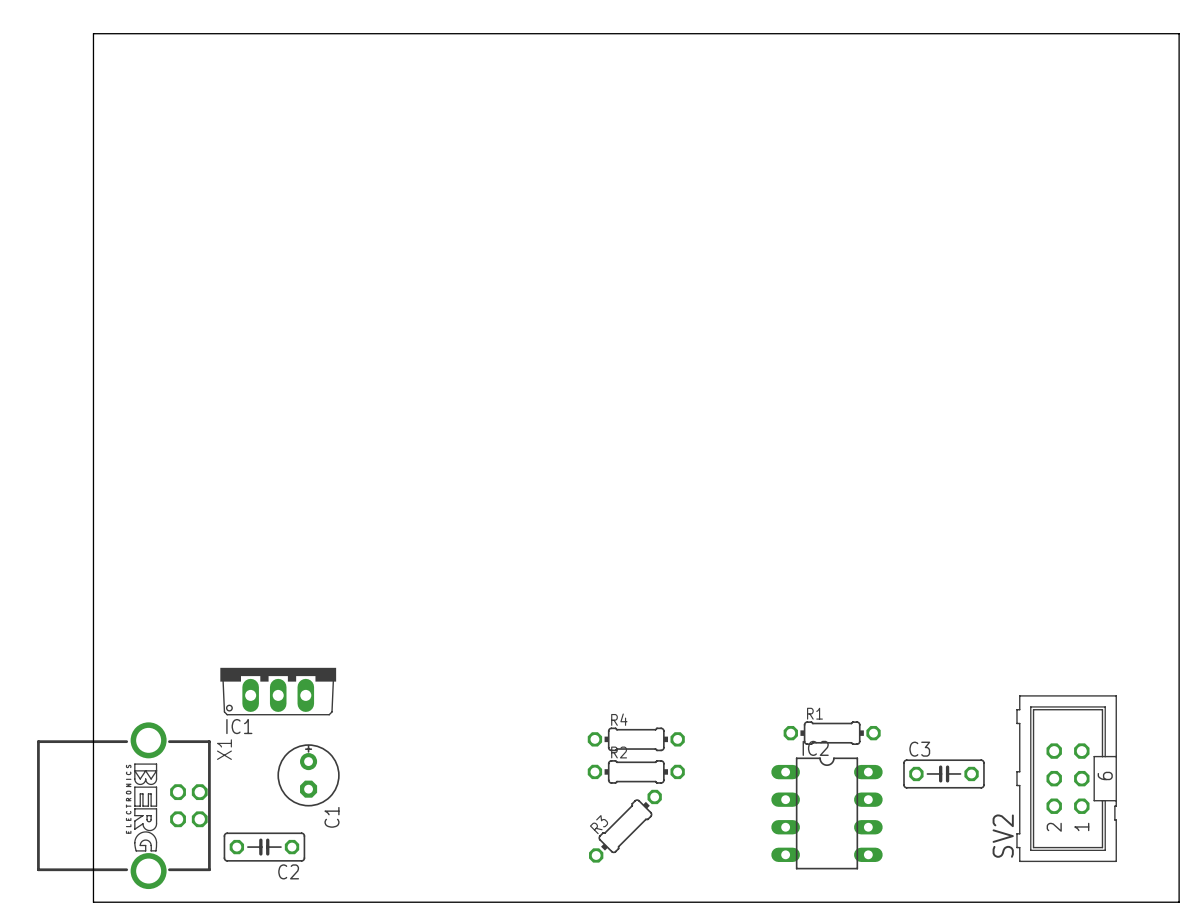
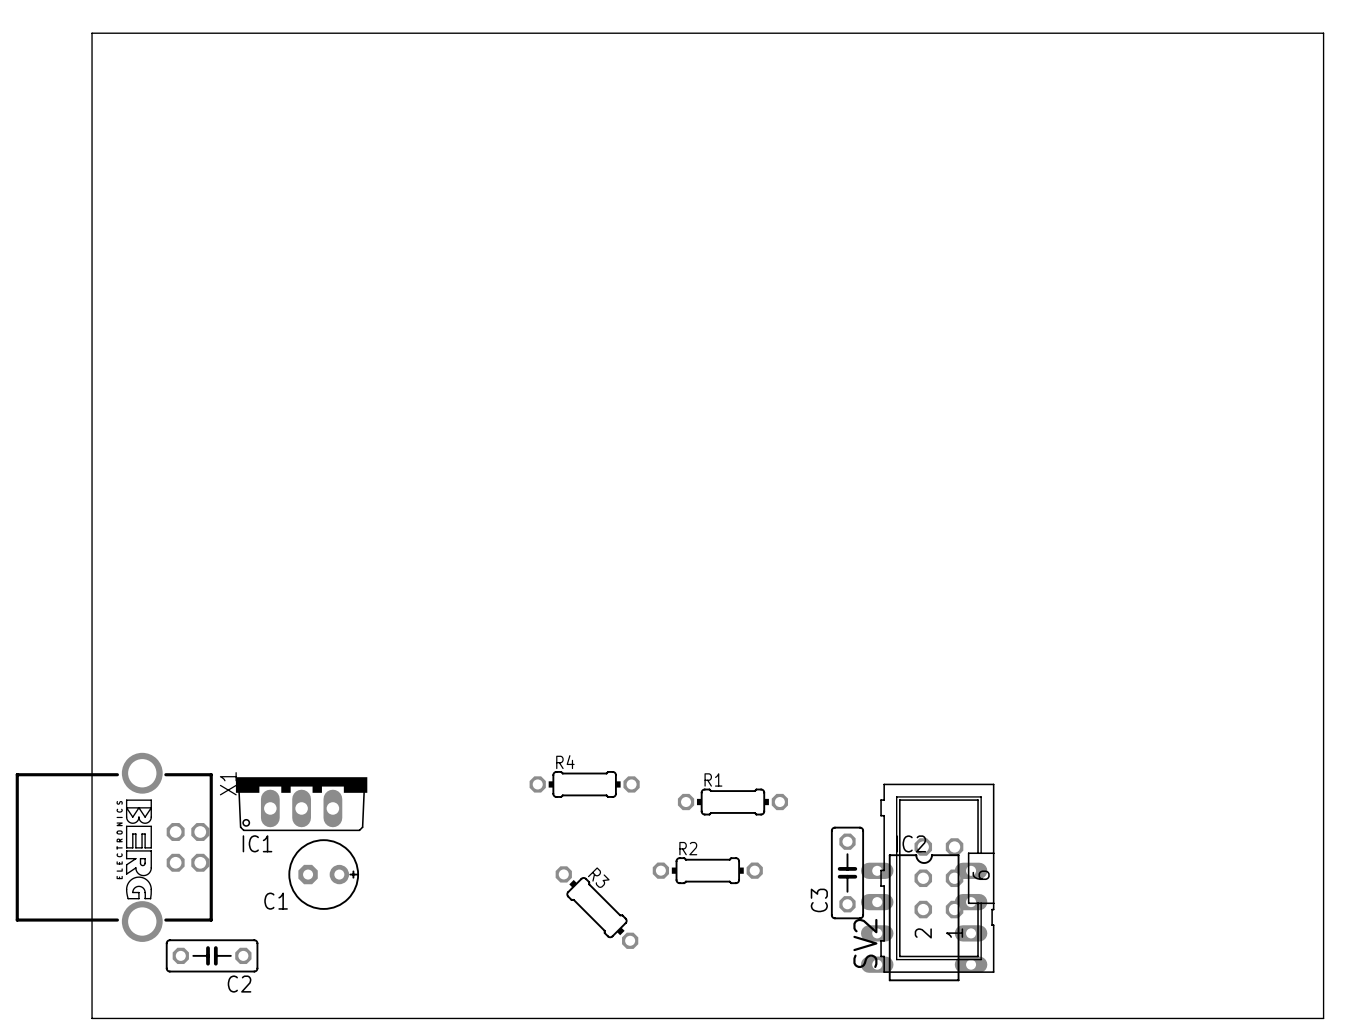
IC1 position: (278, 691) -> (301, 804)
R1 position: (832, 733) -> (732, 802)
R4 position: (636, 739) -> (584, 784)
C3 rotation: 0° (943, 773) -> 90° counterclockwise (847, 872)
C3 position: (943, 773) -> (847, 872)
C1 rotation: 0° (308, 775) -> 90° clockwise (323, 874)
SV2 position: (1066, 778) -> (937, 878)
X1 position: (123, 805) -> (114, 847)
R3 rotation: 0° (625, 826) -> 90° clockwise (596, 907)
R3 position: (625, 826) -> (596, 907)
C2 position: (264, 847) -> (212, 955)

